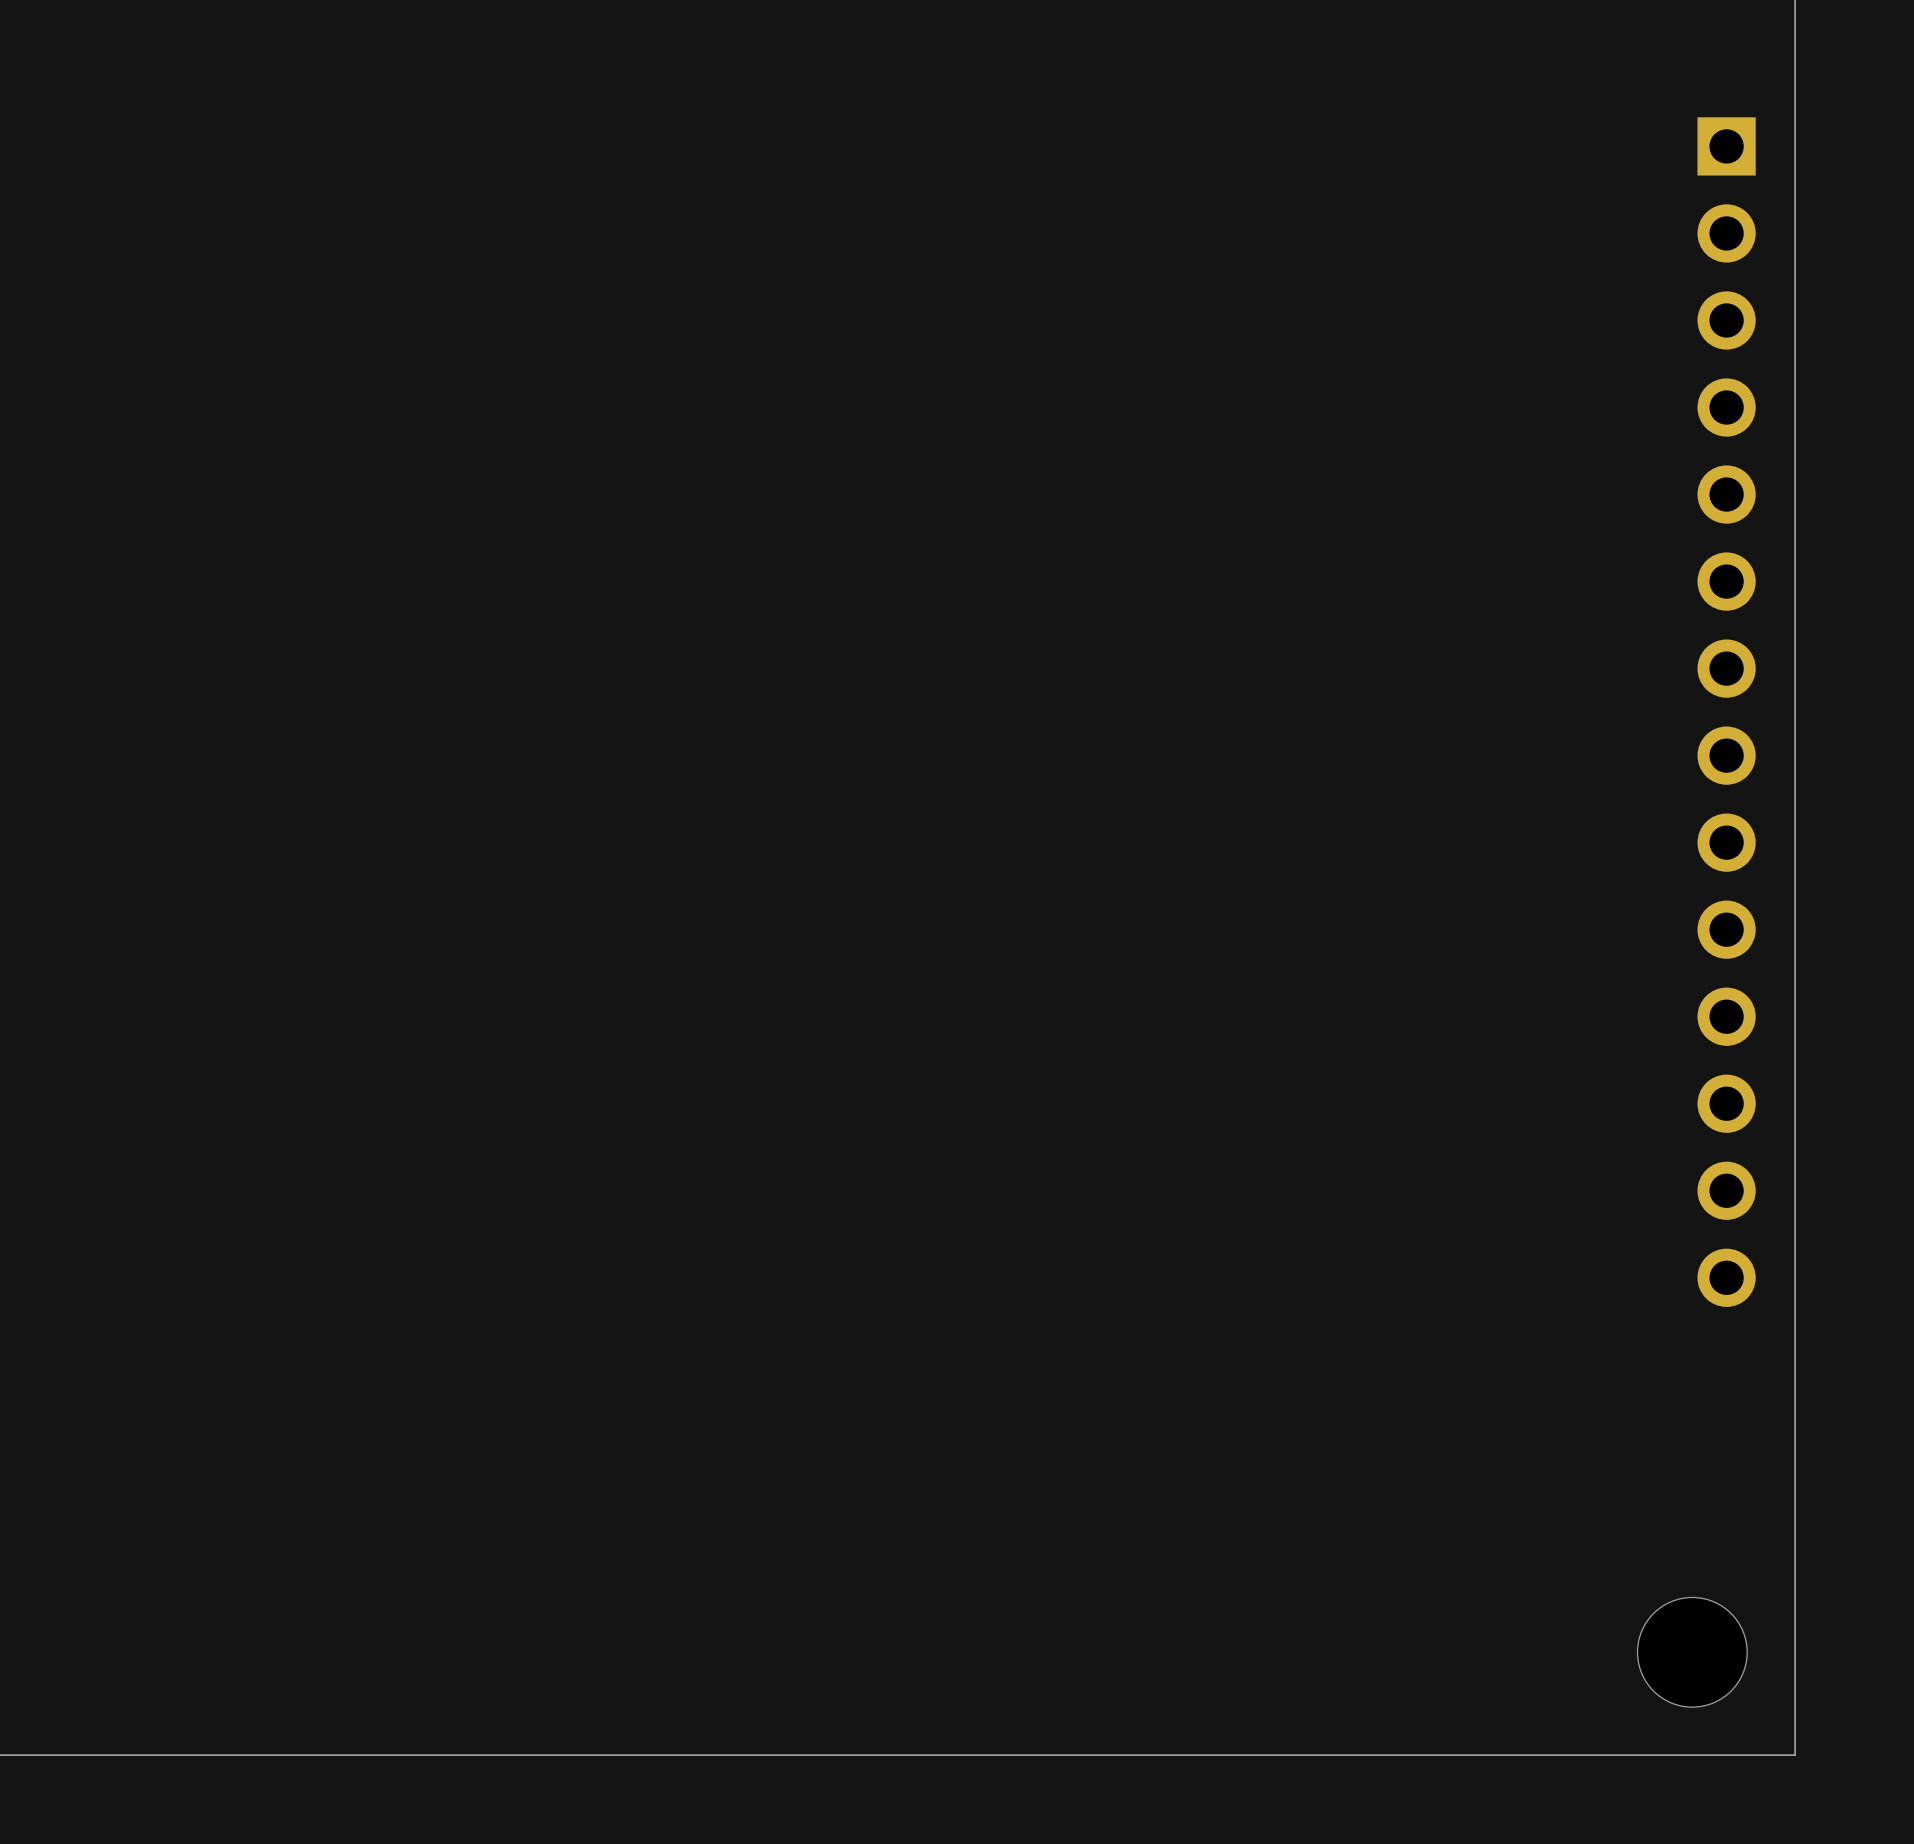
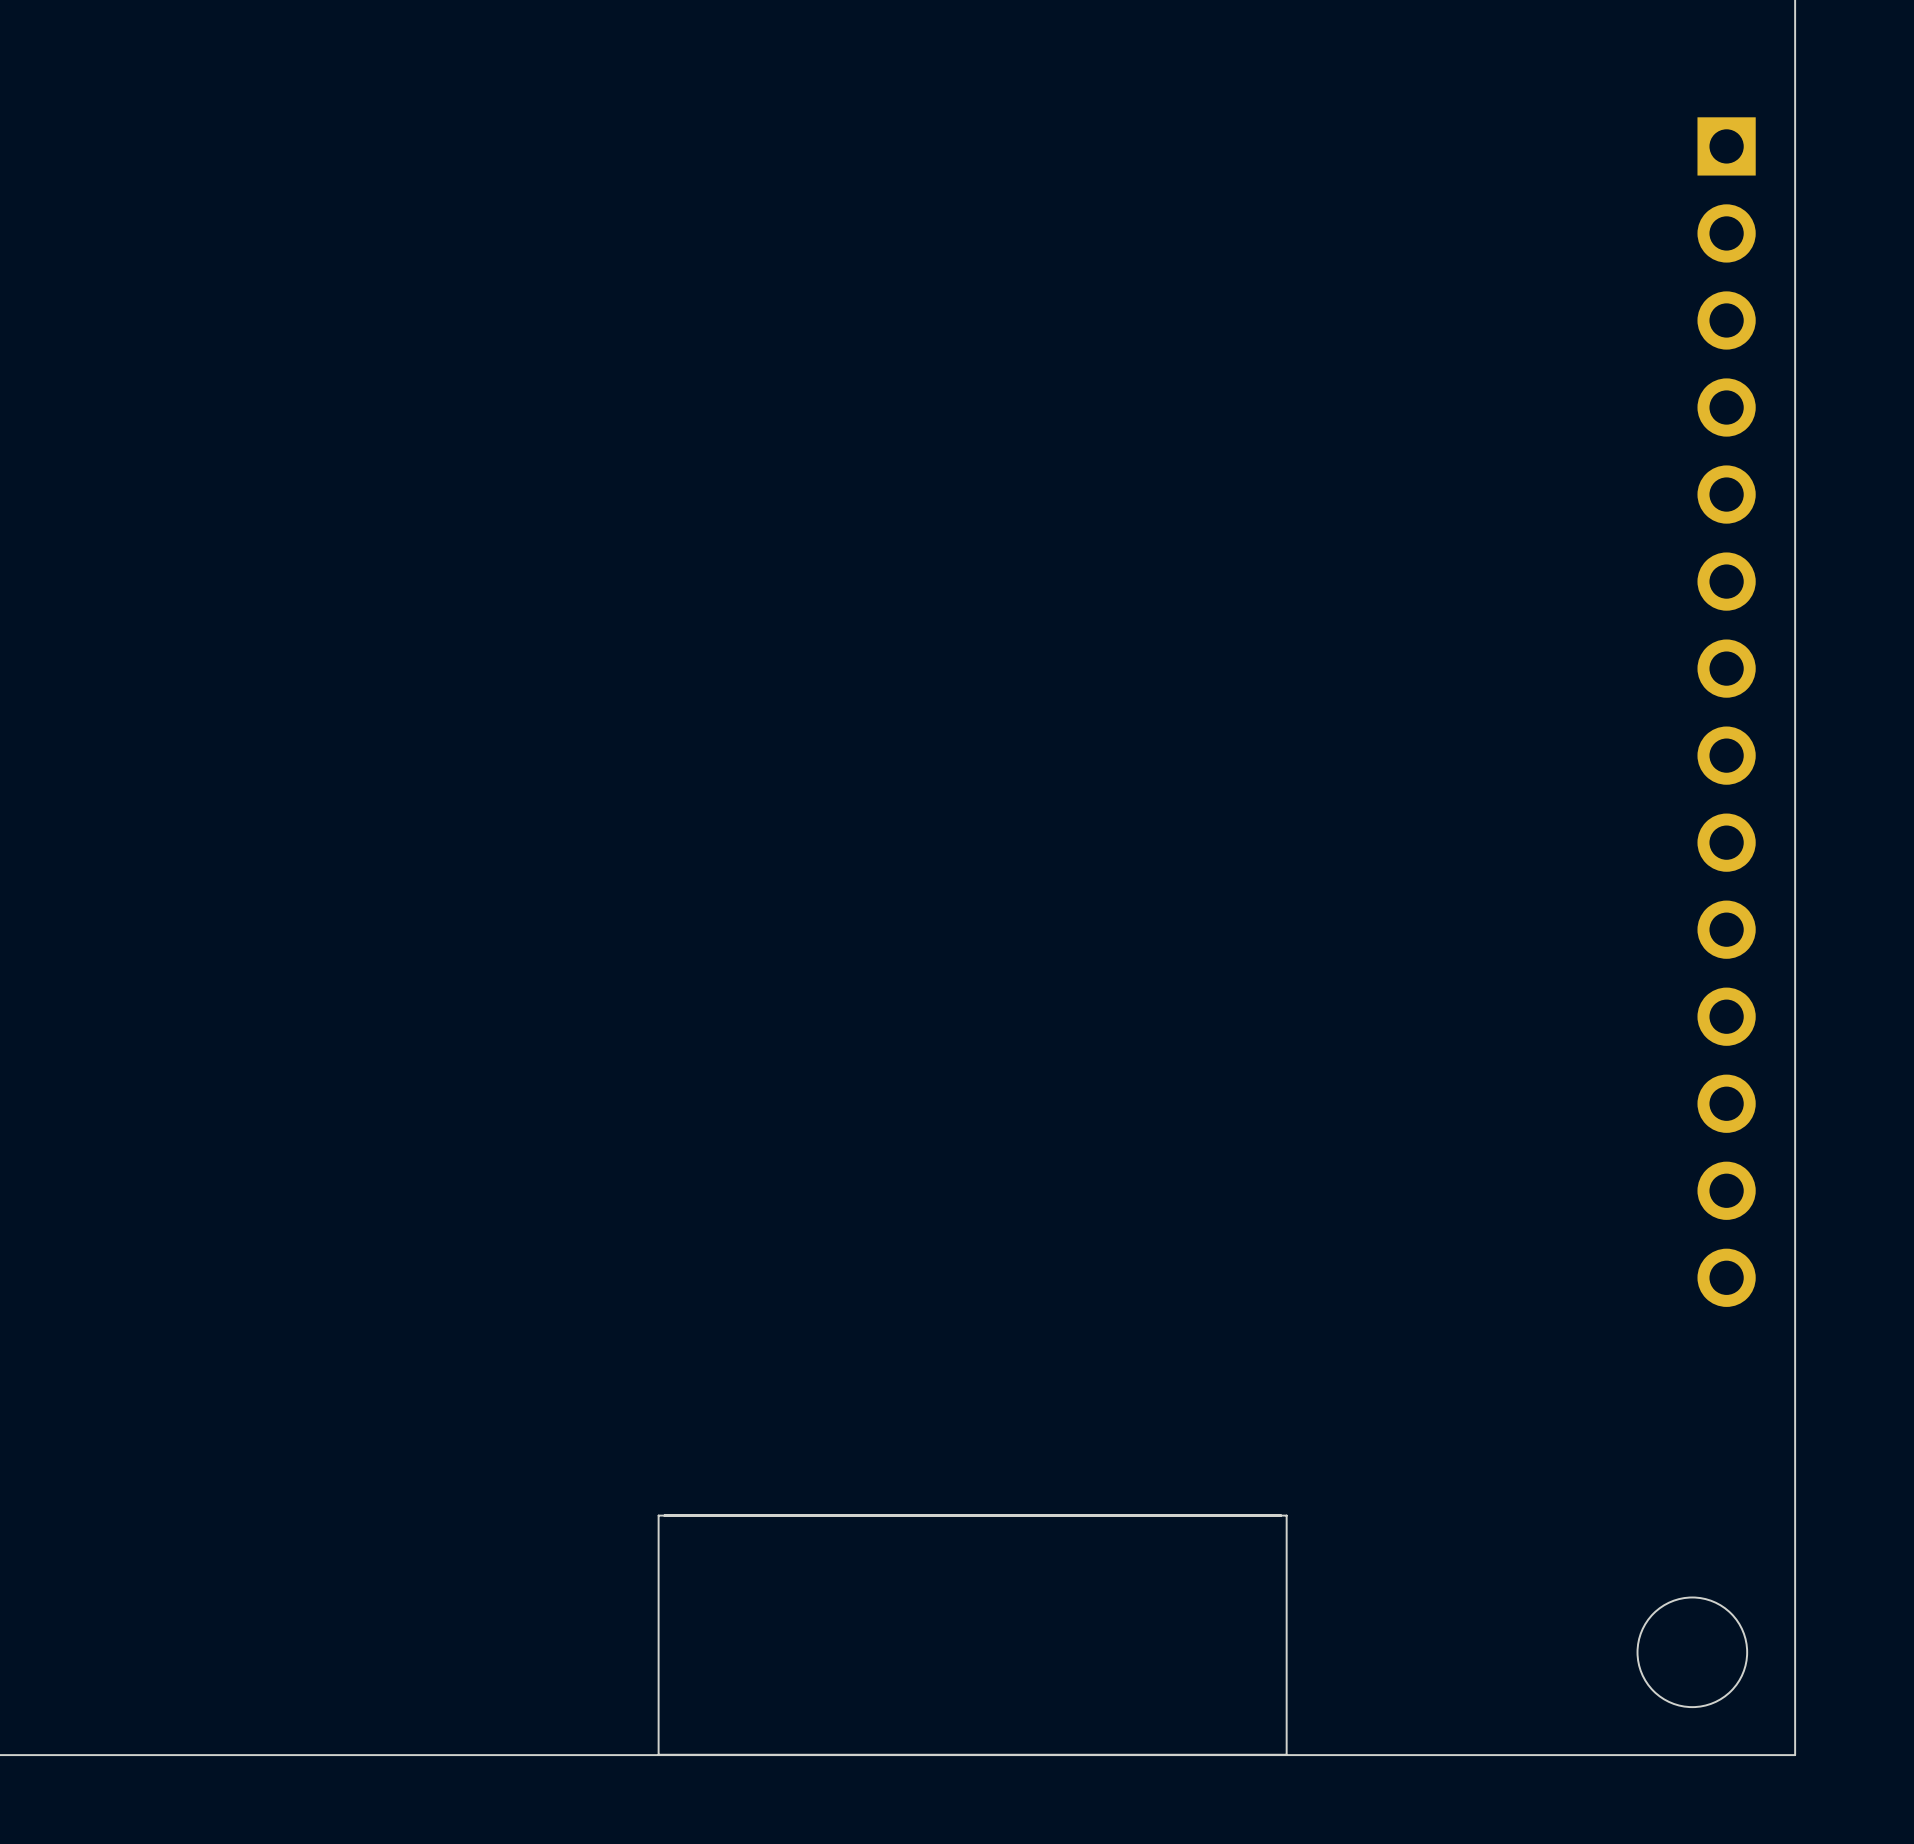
board edge: none -> (1286, 1515) (658, 1515) (658, 1754) (1286, 1754) (1286, 1515)

